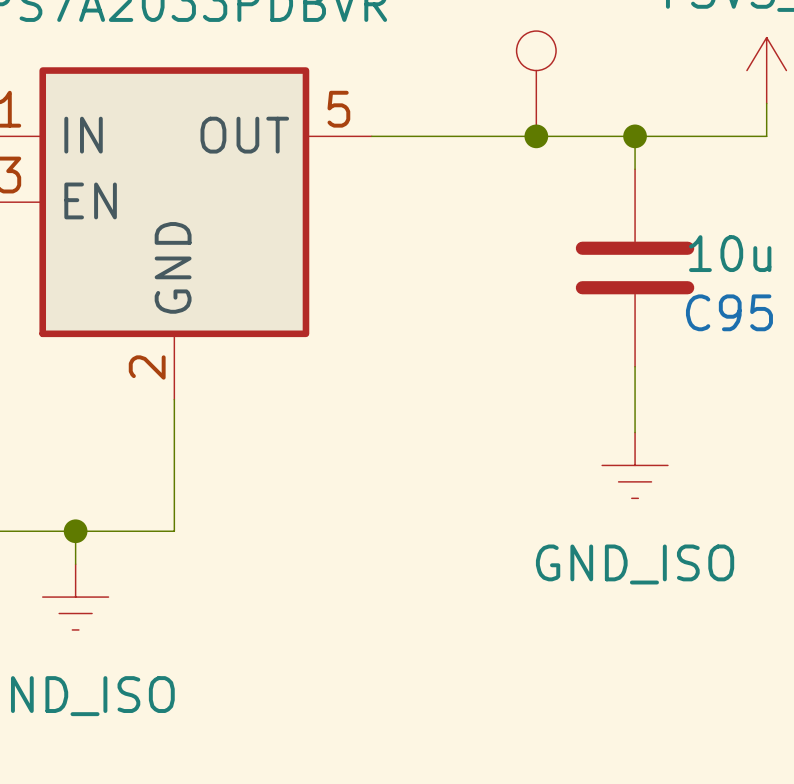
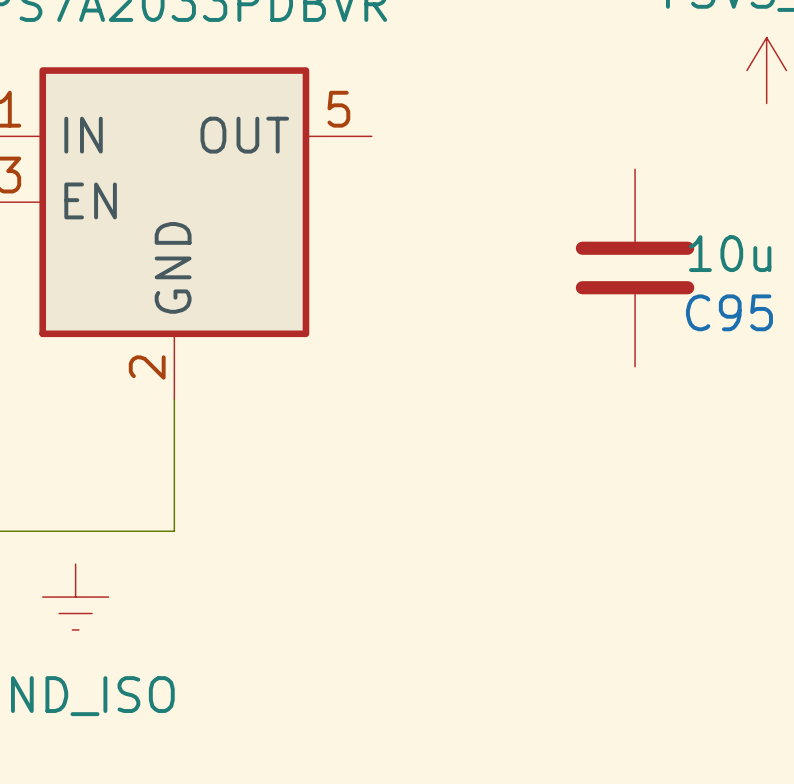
part: (536, 83) -> none
wire: (766, 103) (766, 136) (371, 136) -> none
junction: (536, 136) -> none
wire: (635, 136) (635, 169) -> none
junction: (635, 136) -> none
wire: (635, 366) (635, 432) -> none
power symbol: GND_ISO (635, 465) -> none
wire: (75, 531) (75, 564) -> none
junction: (75, 531) -> none

